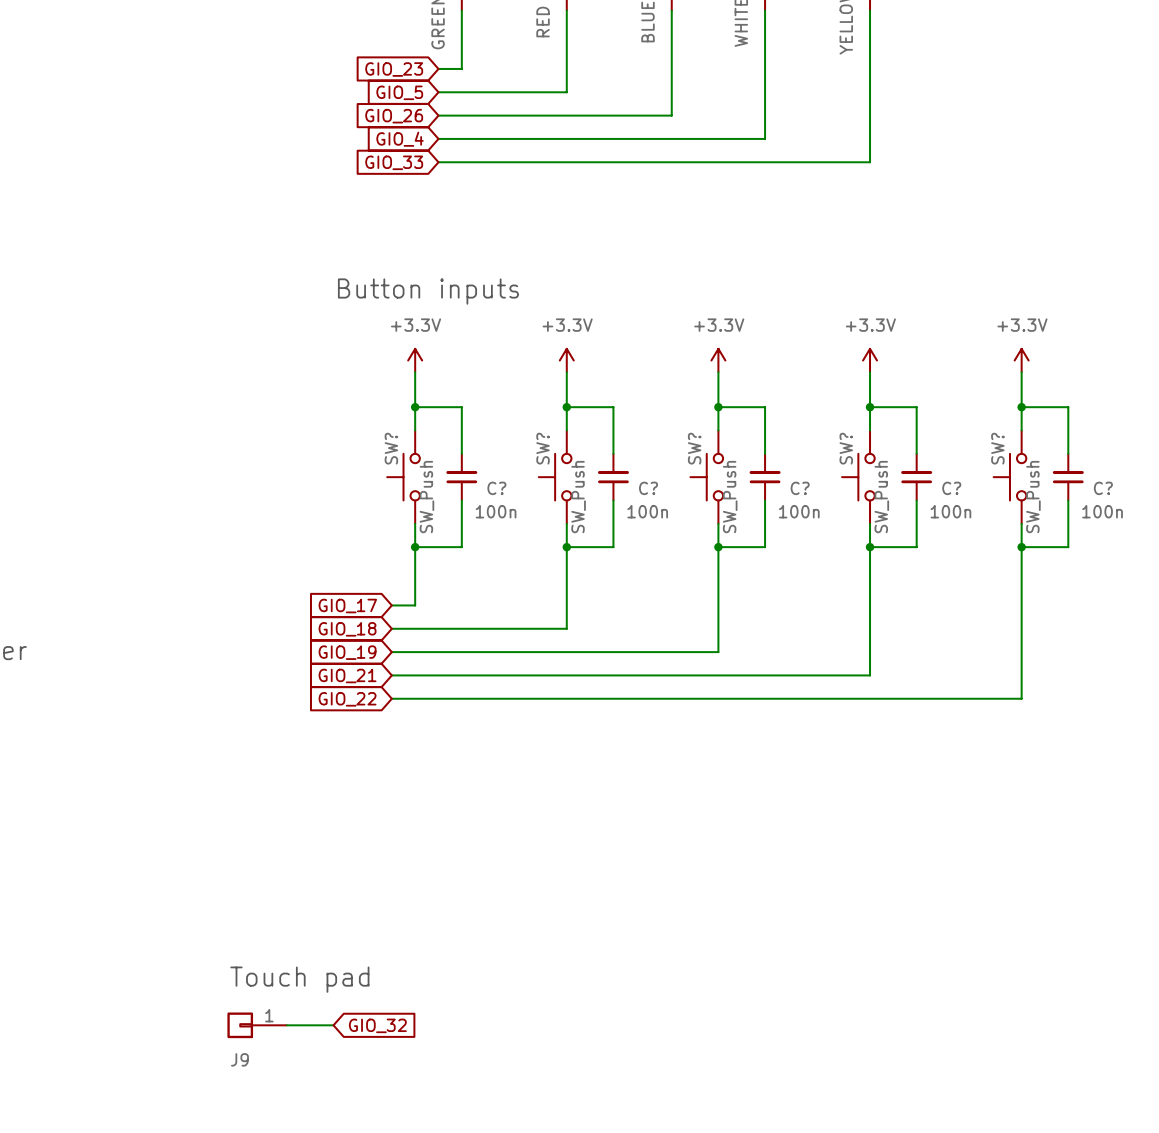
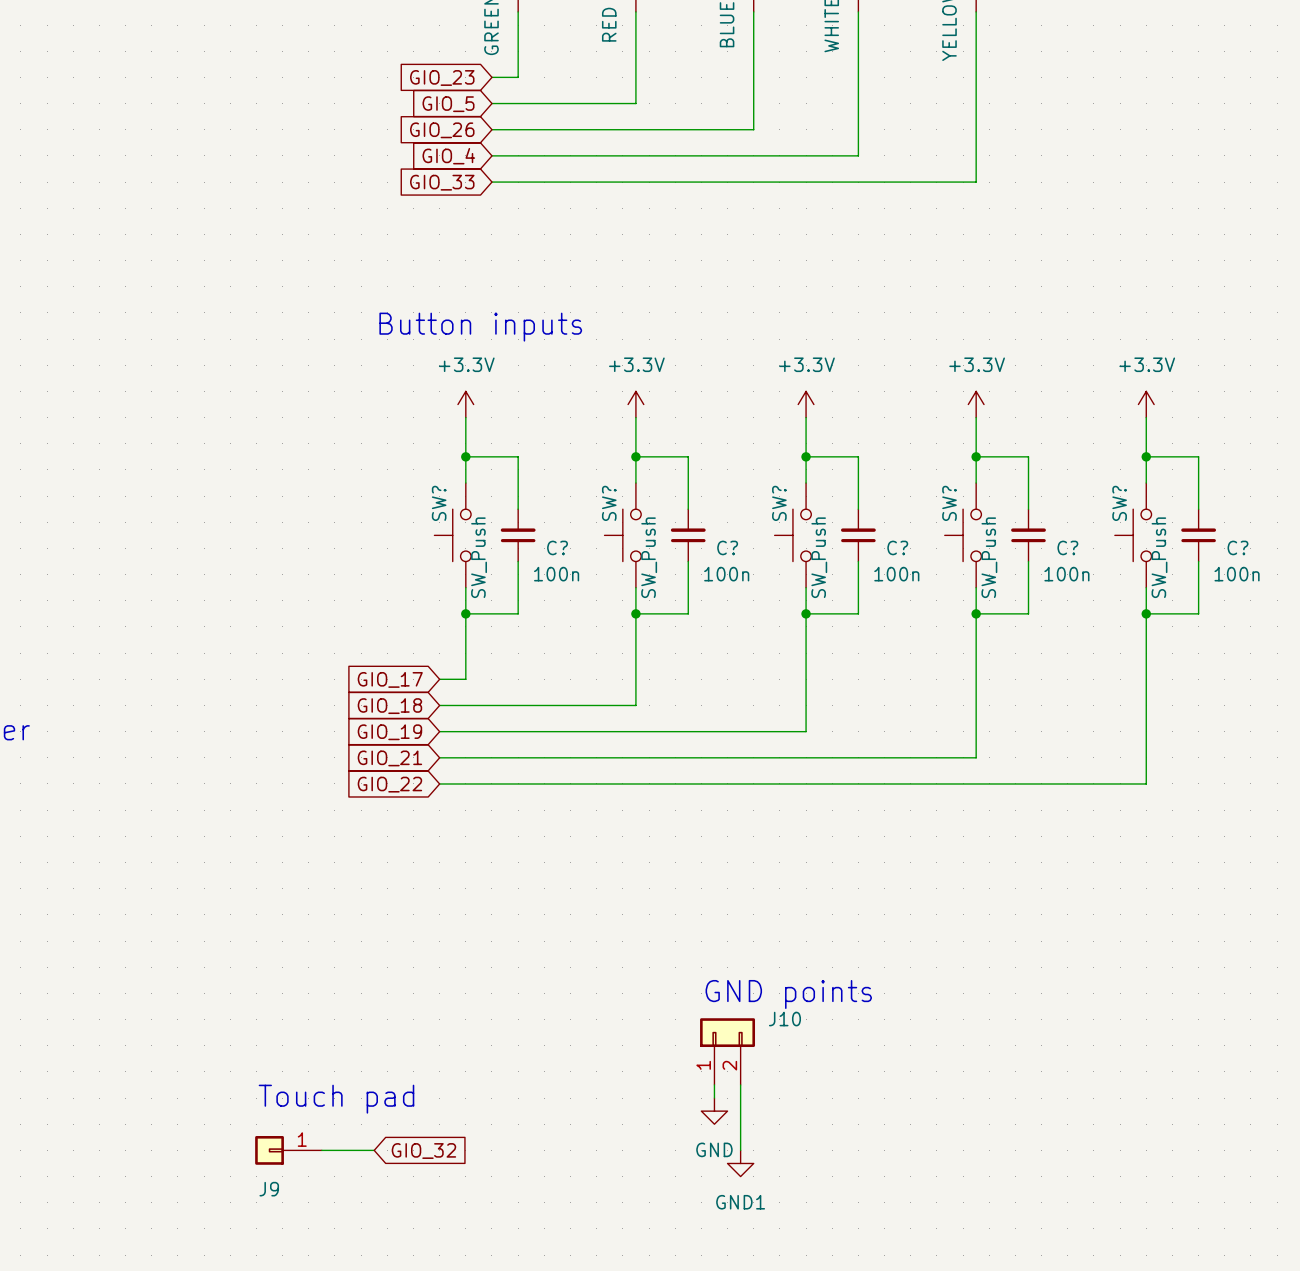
text: none -> GND points (788, 994)
J10: none -> (727, 1051)
wire: none -> (714, 1084) (714, 1098)
wire: none -> (740, 1084) (740, 1150)
power symbol: none -> GND (714, 1111)
power symbol: none -> GND1 (740, 1163)

